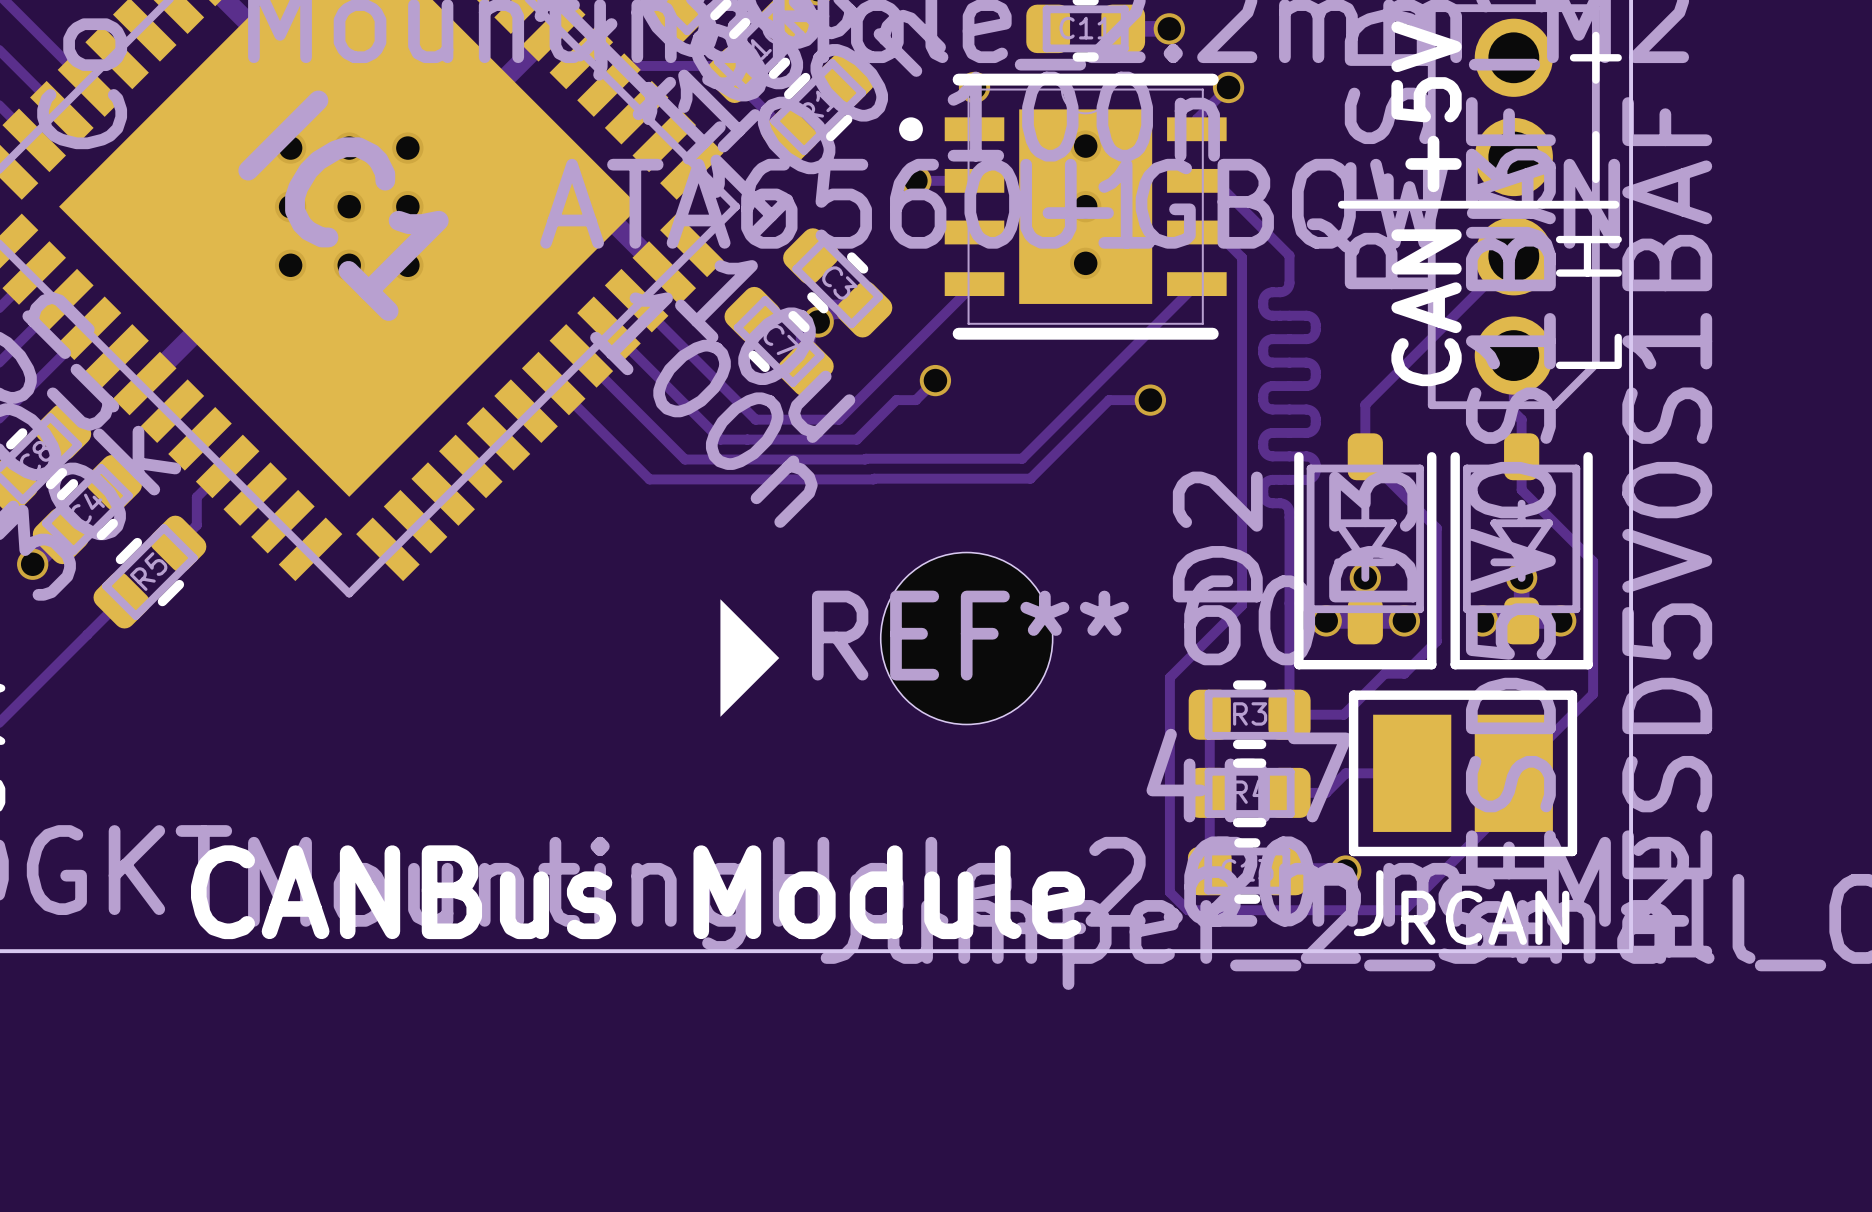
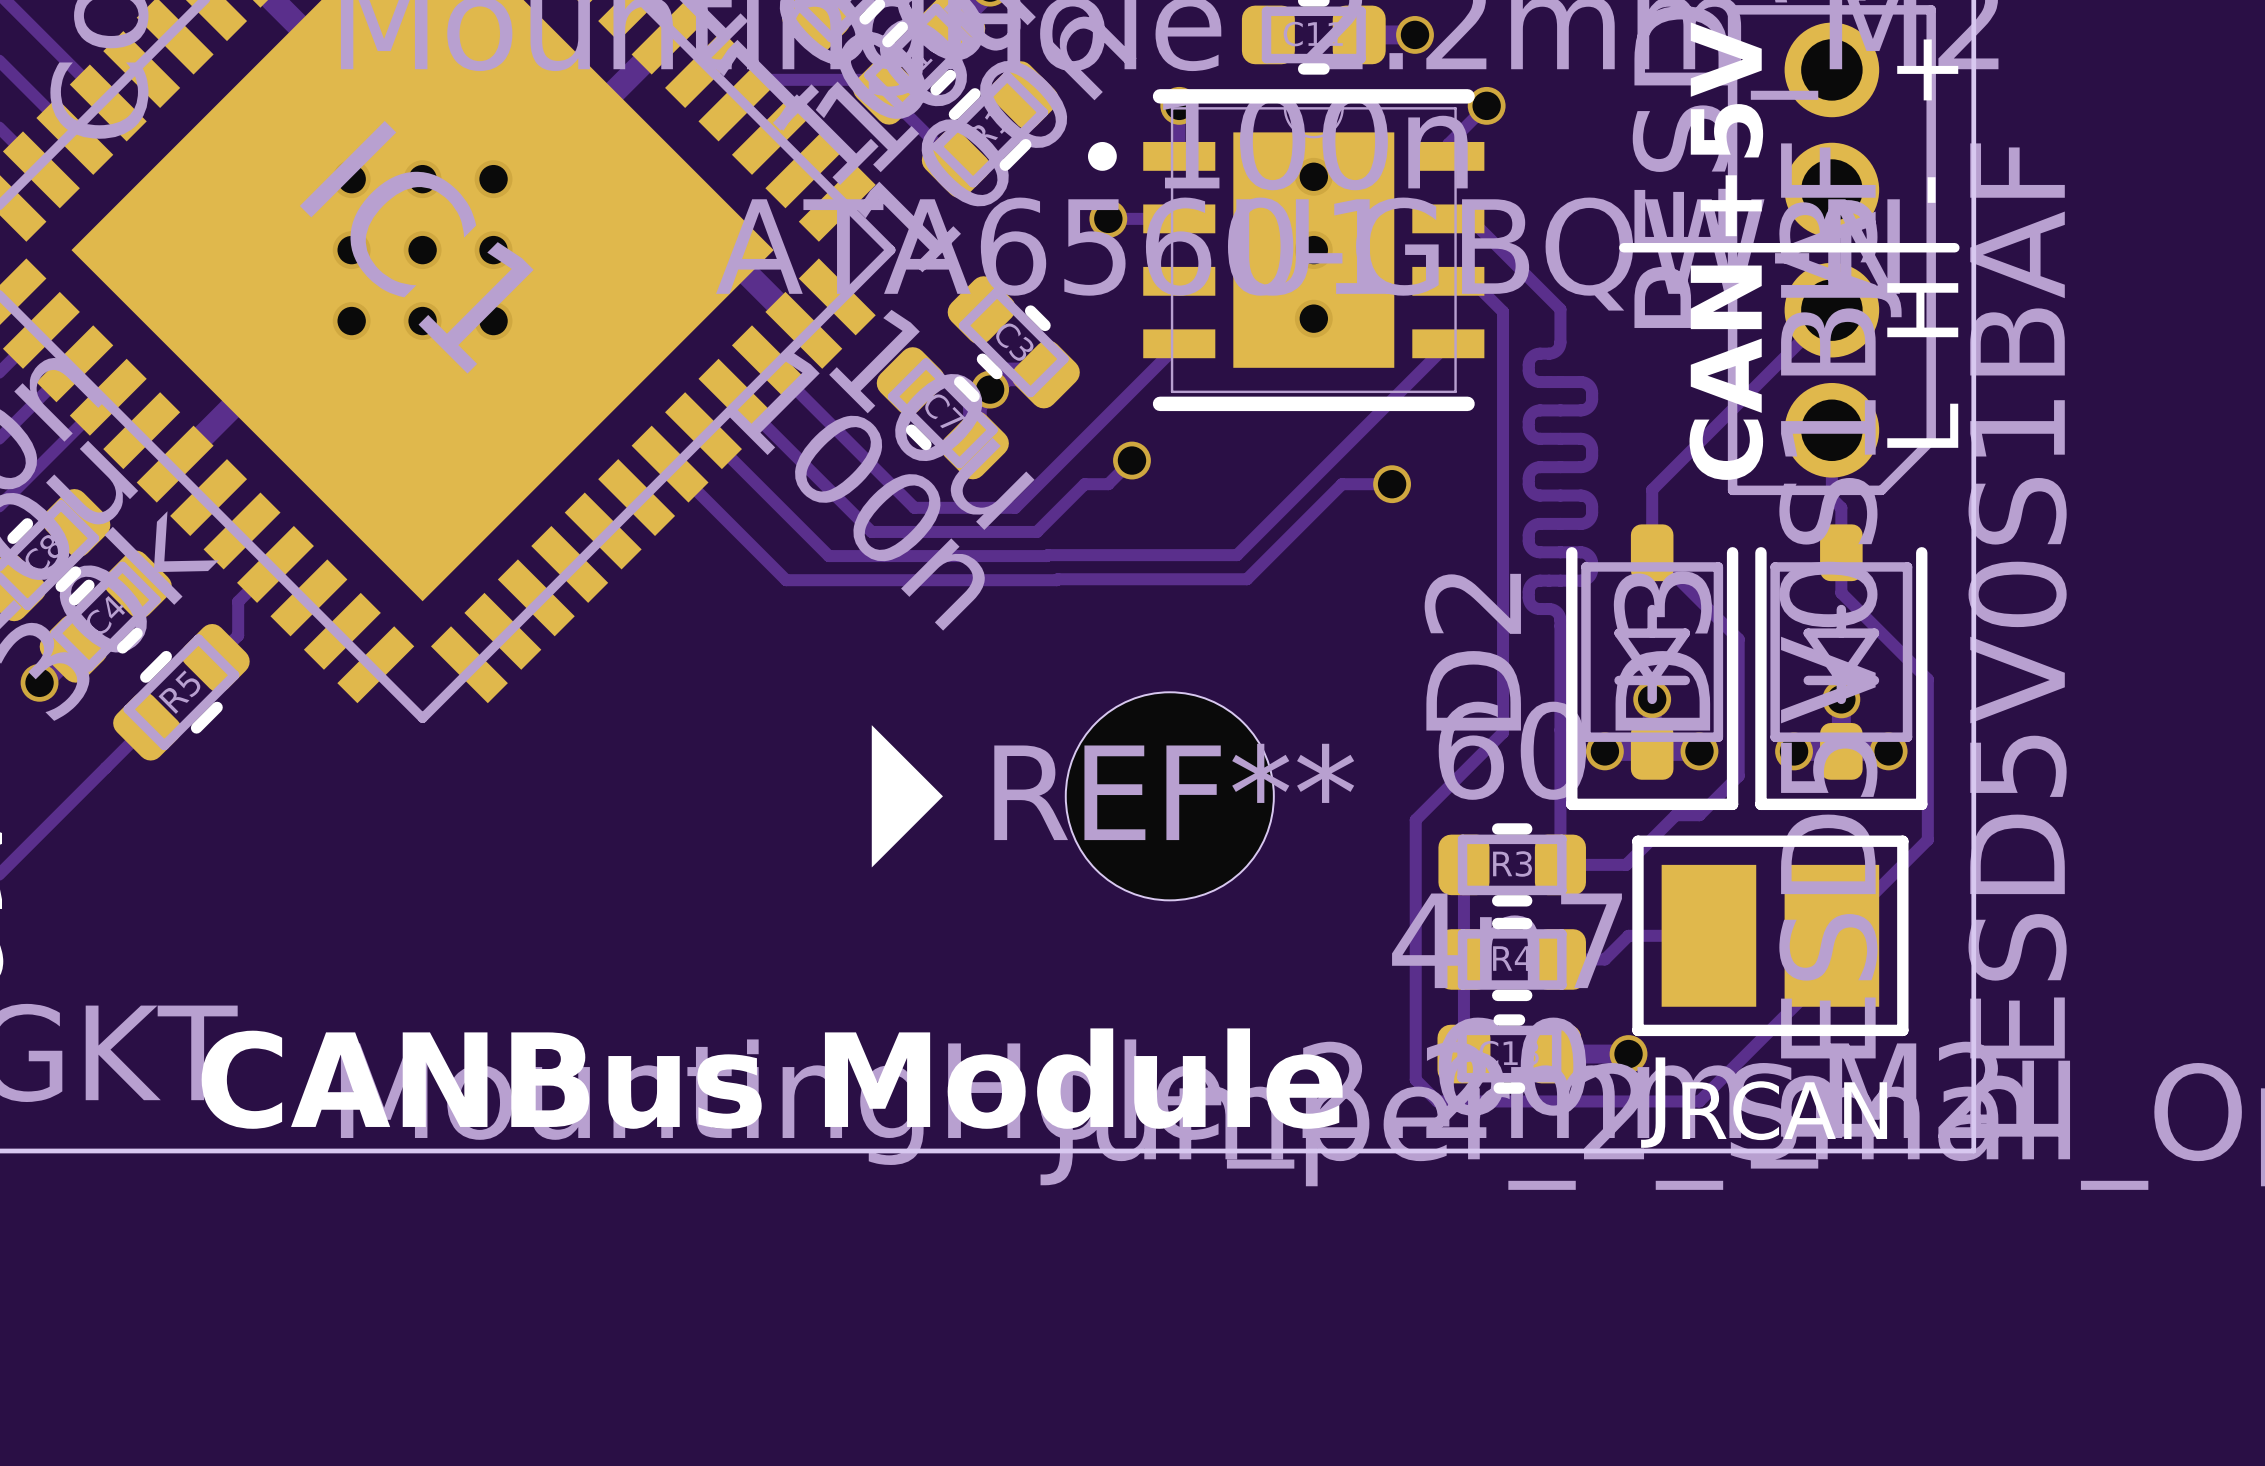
REF** position: (966, 638) -> (1169, 796)

